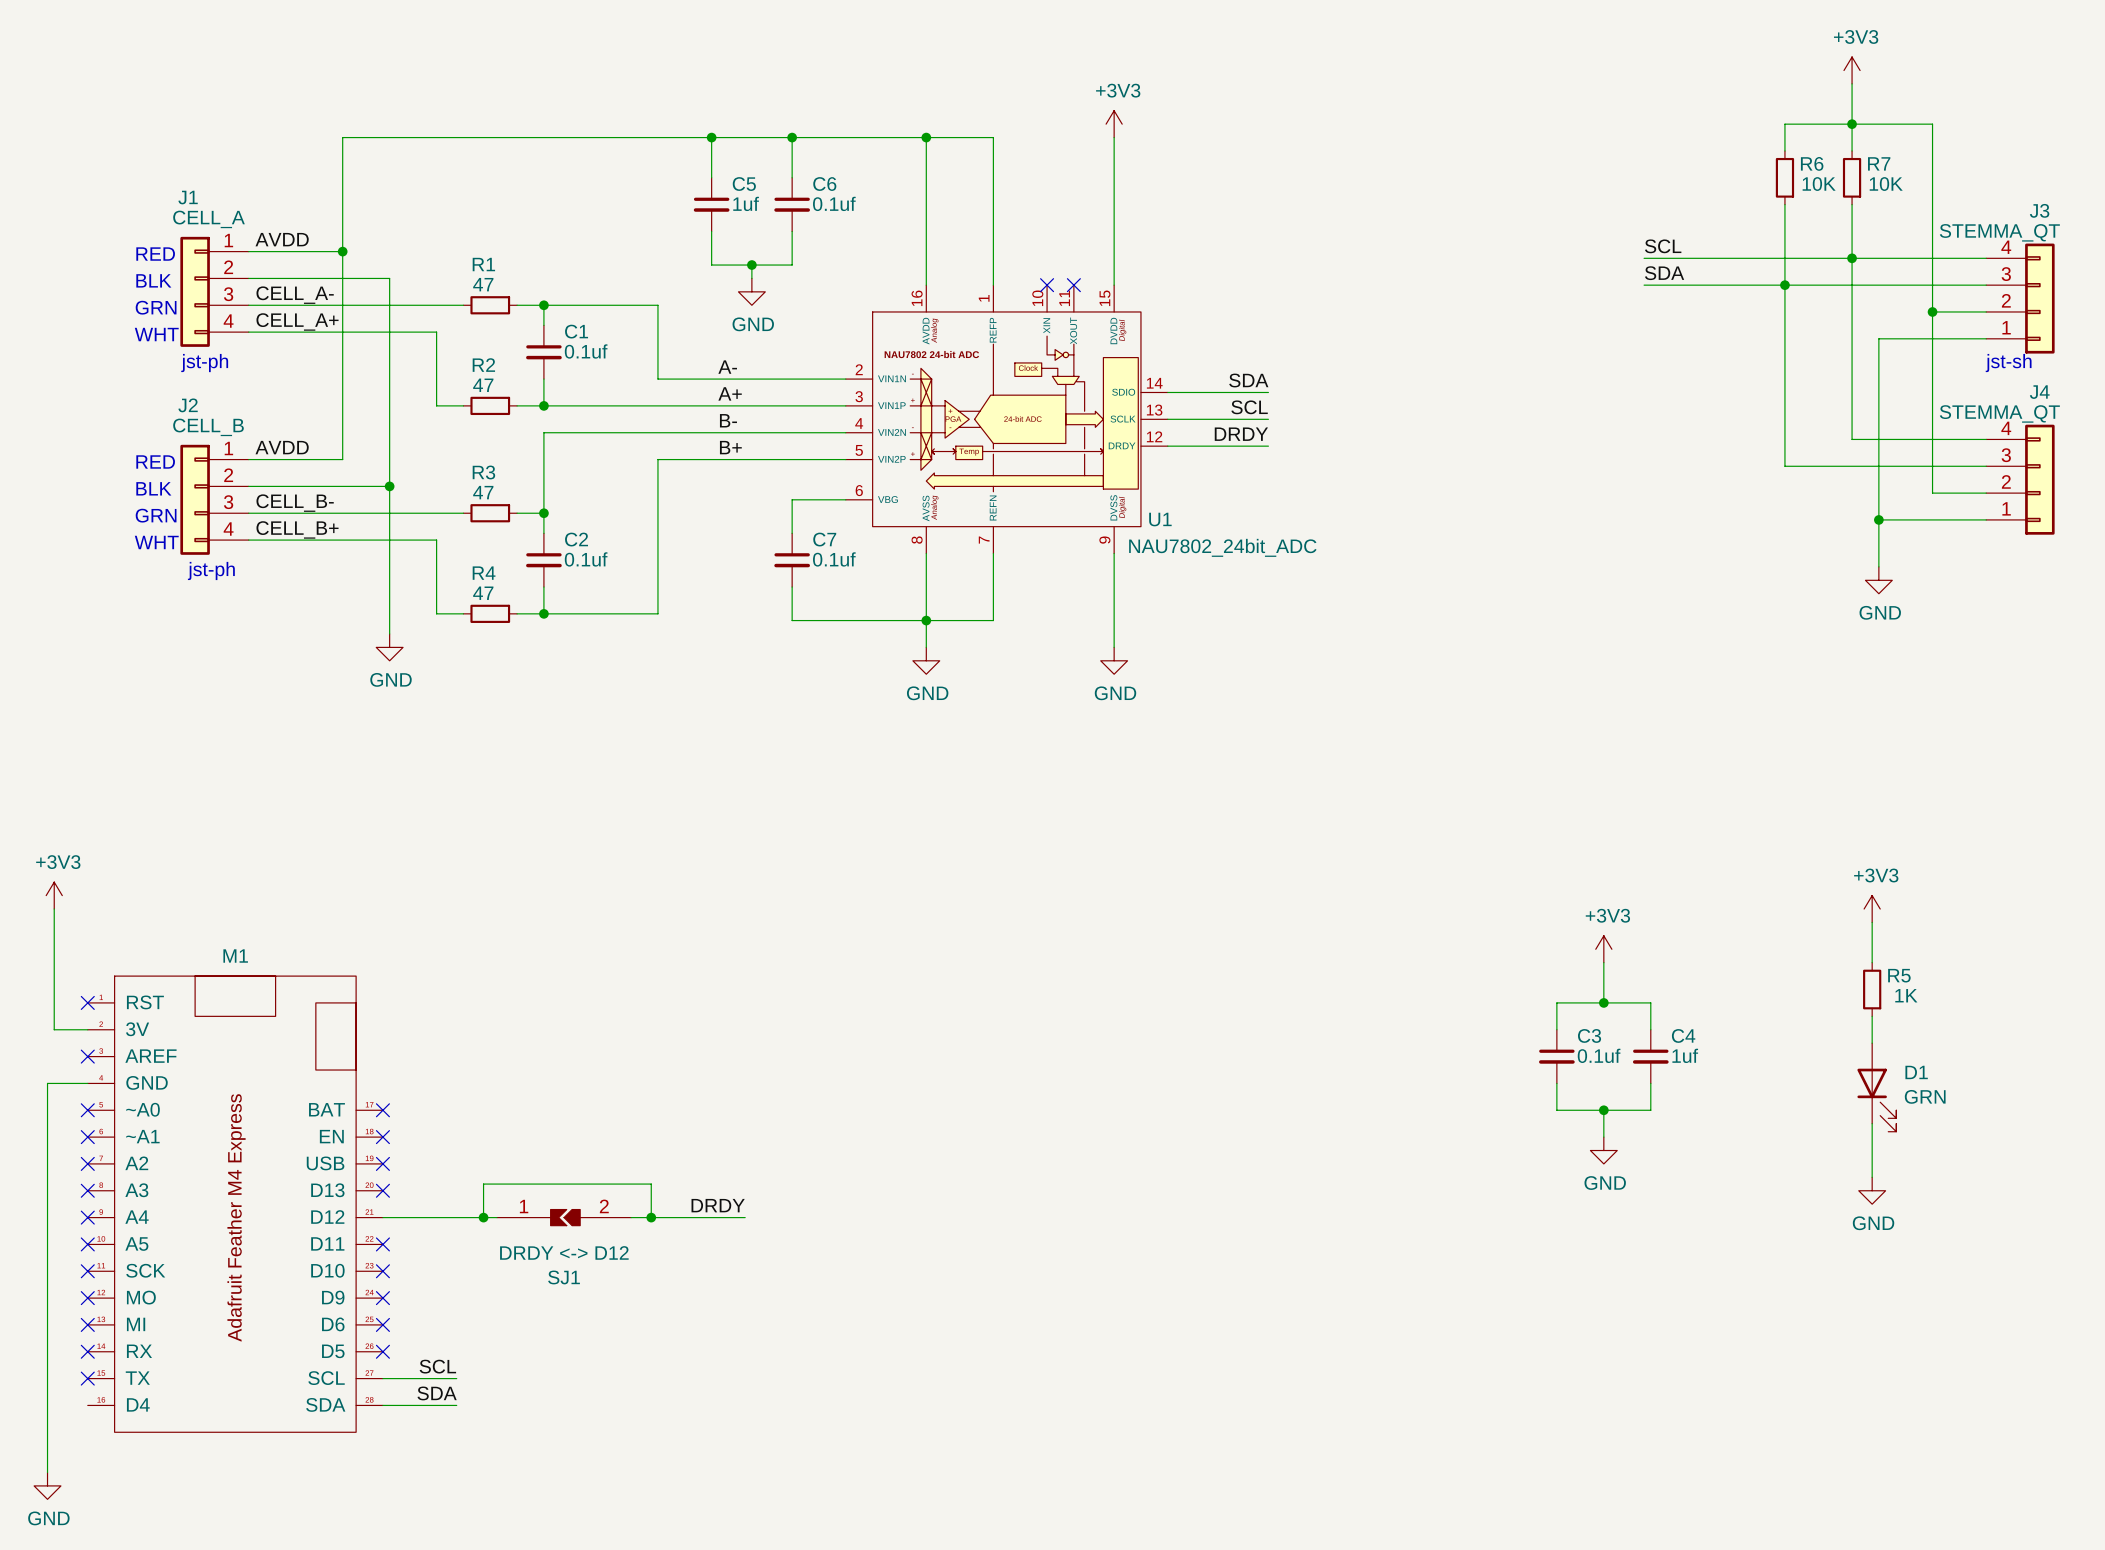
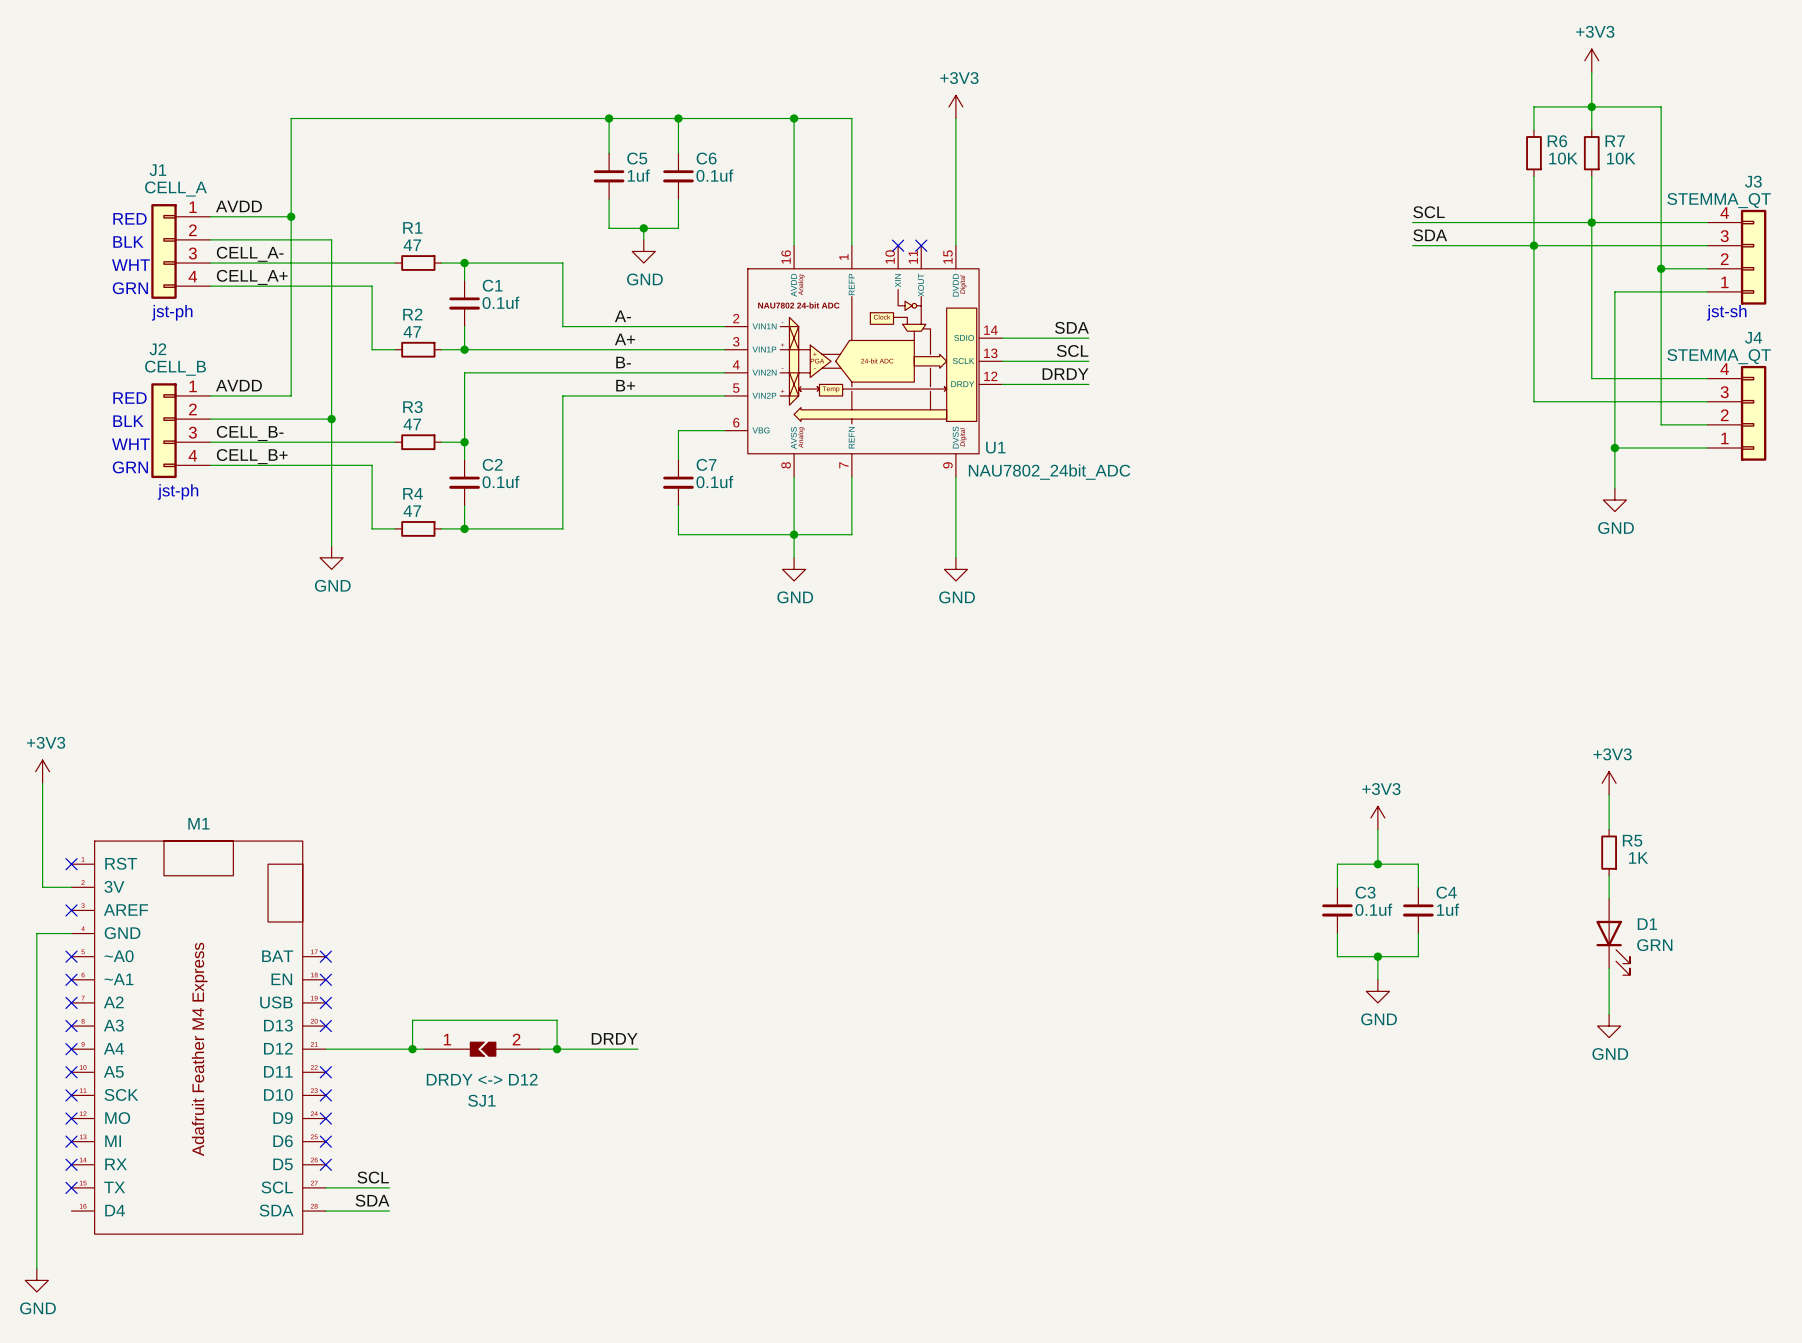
text: GRN (156, 307) -> WHT (130, 265)
text: WHT (156, 334) -> GRN (130, 288)
text: GRN (156, 515) -> WHT (130, 444)
text: WHT (156, 542) -> GRN (130, 467)

